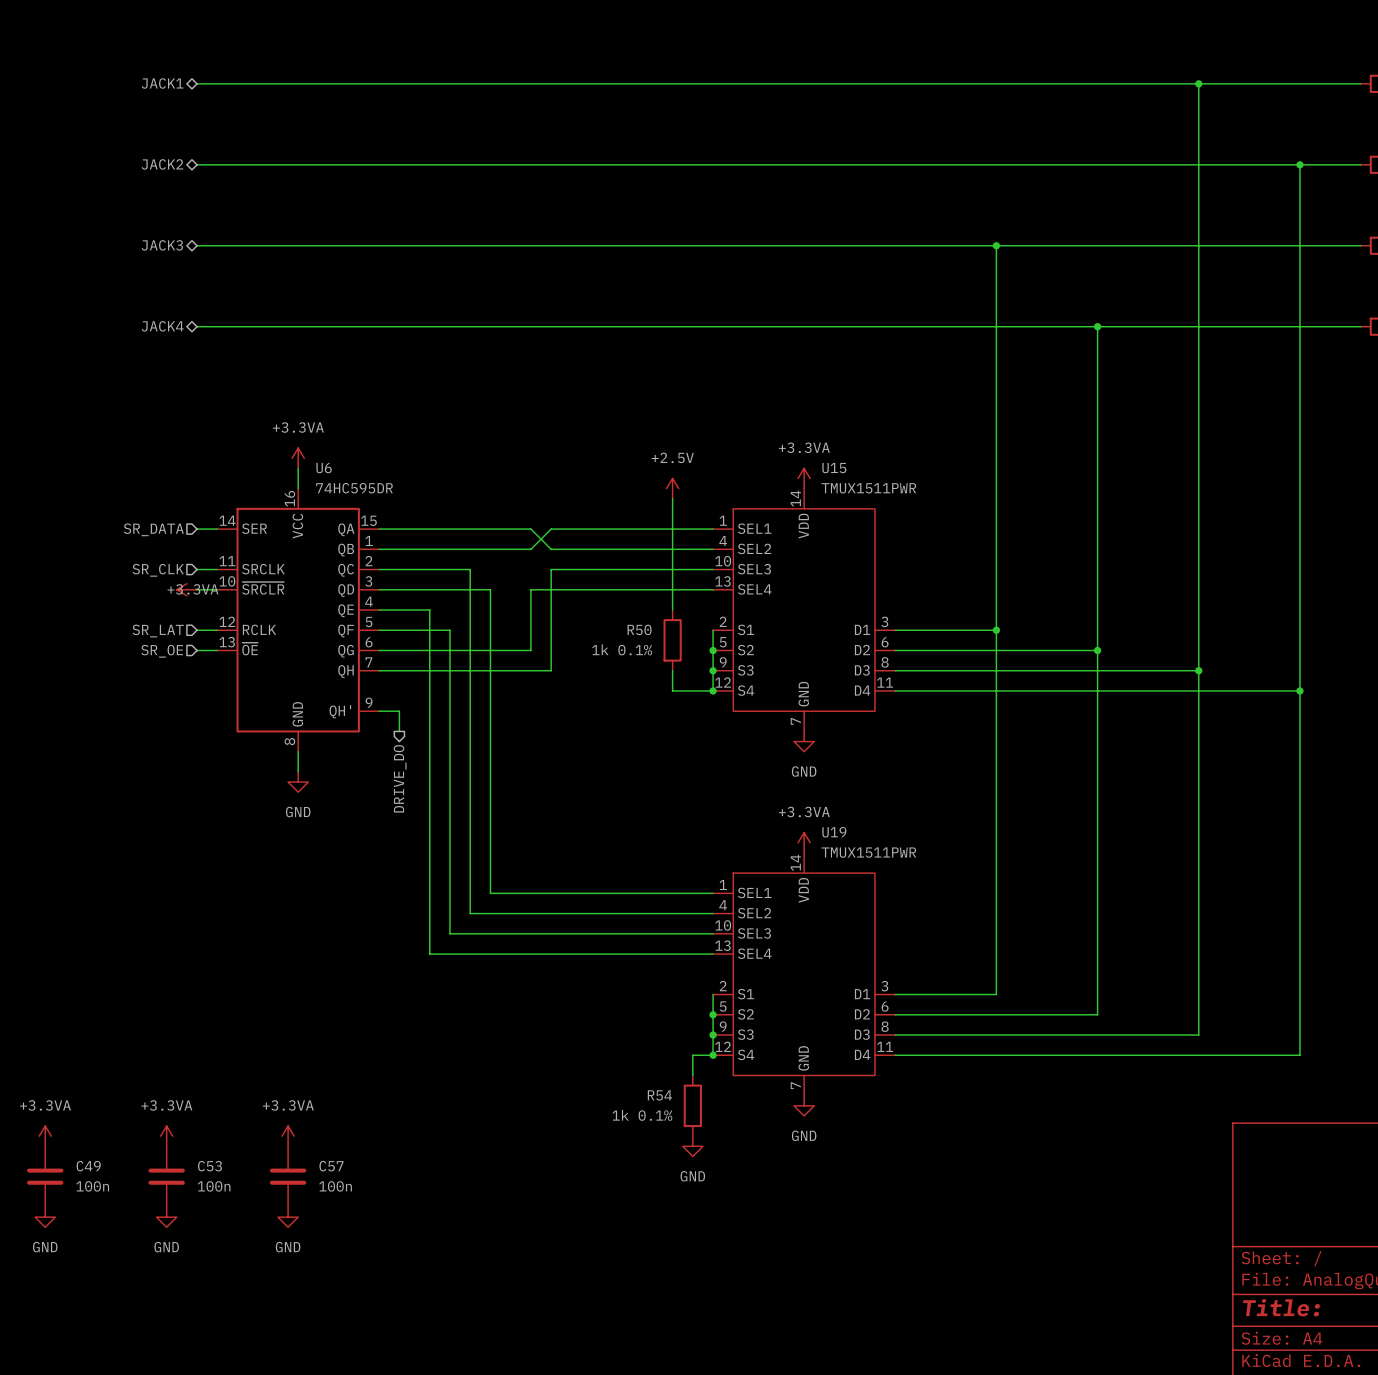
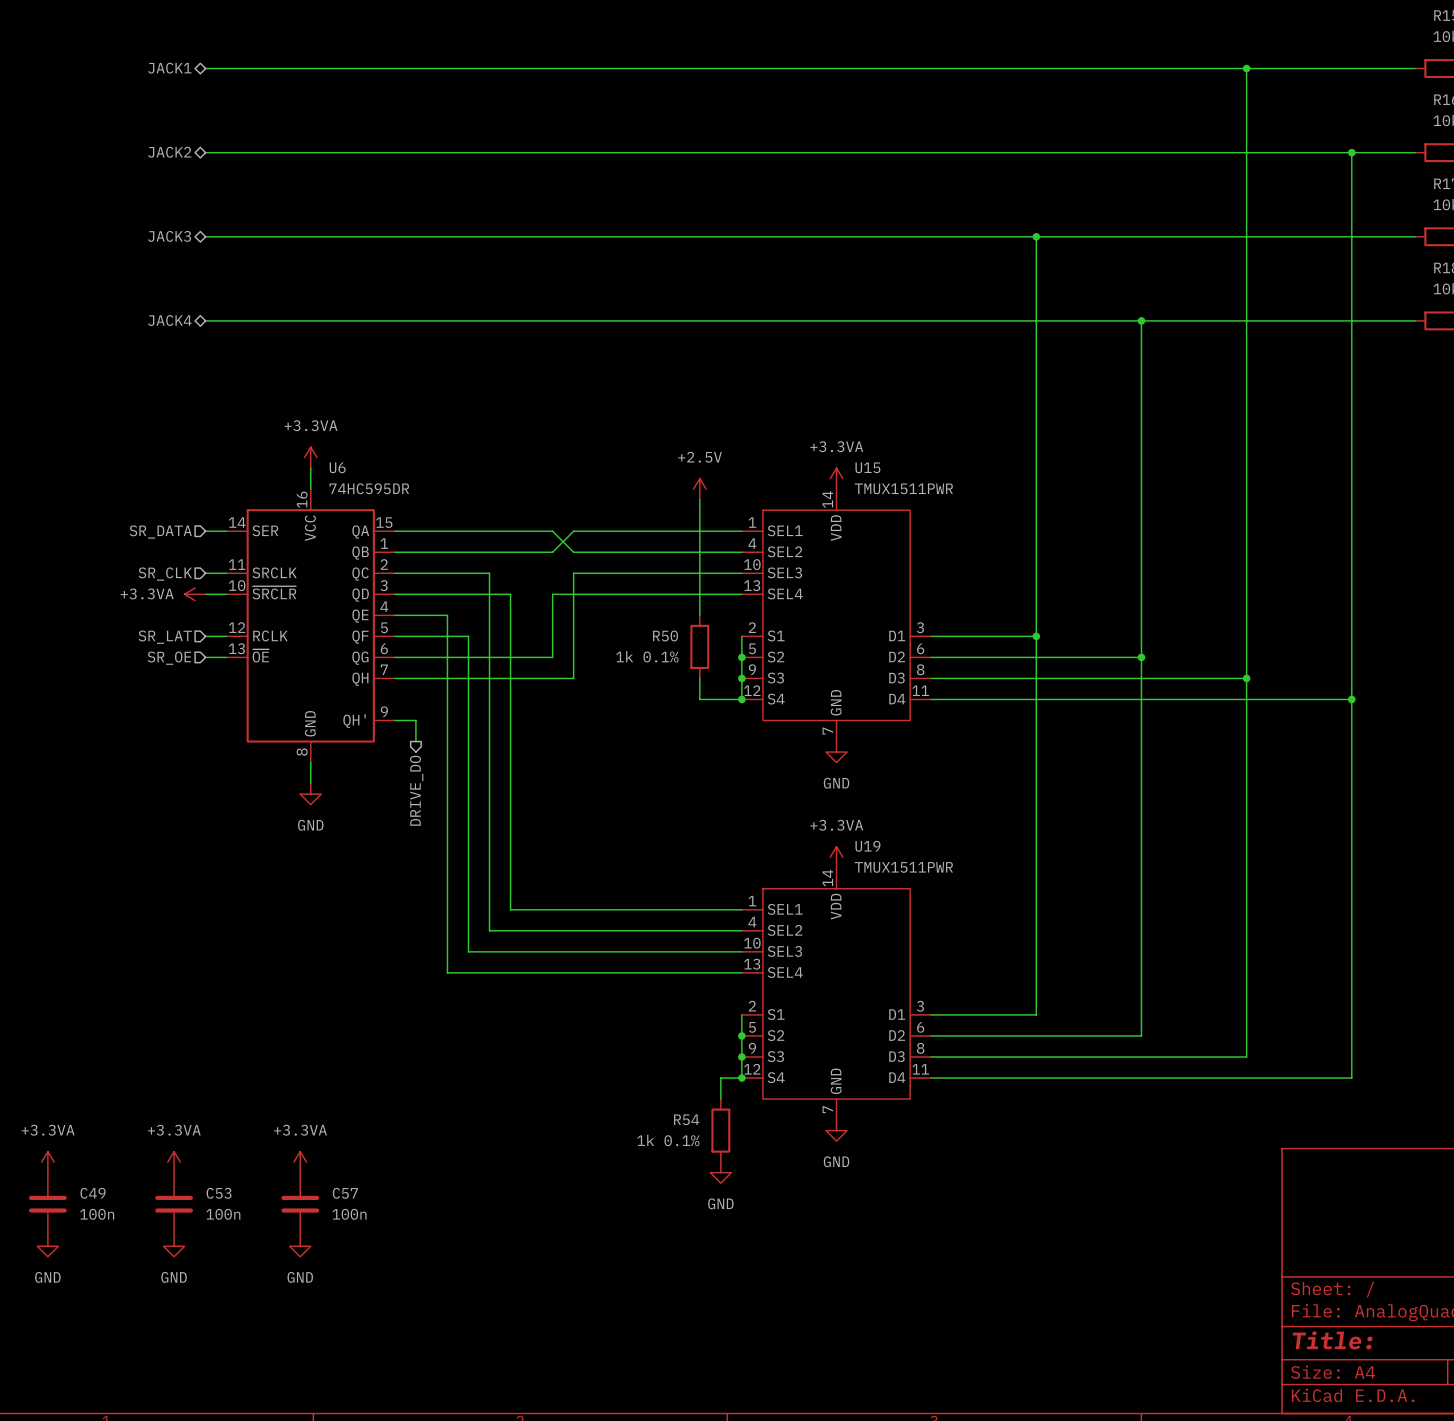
power symbol text position: +3.3VA (192, 589) -> +3.3VA (147, 593)

